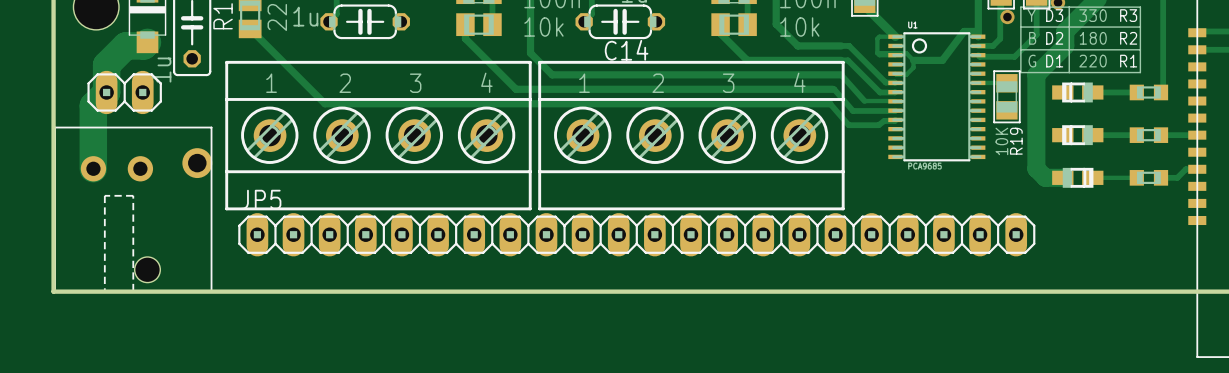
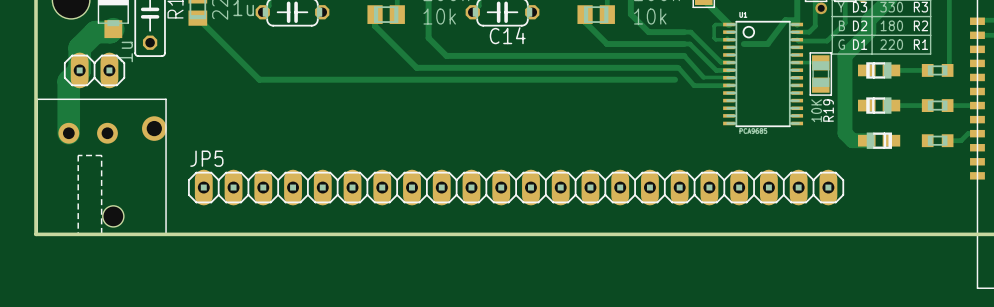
track: (877, 53) (906, 53) (913, 60) (913, 67) (906, 74) (895, 73) -> none
track: (829, 103) (848, 125) (878, 125) (884, 120) (895, 119) -> none
part: (378, 135) -> none
part: (691, 135) -> none
track: (1092, 177) (1136, 177) -> none

